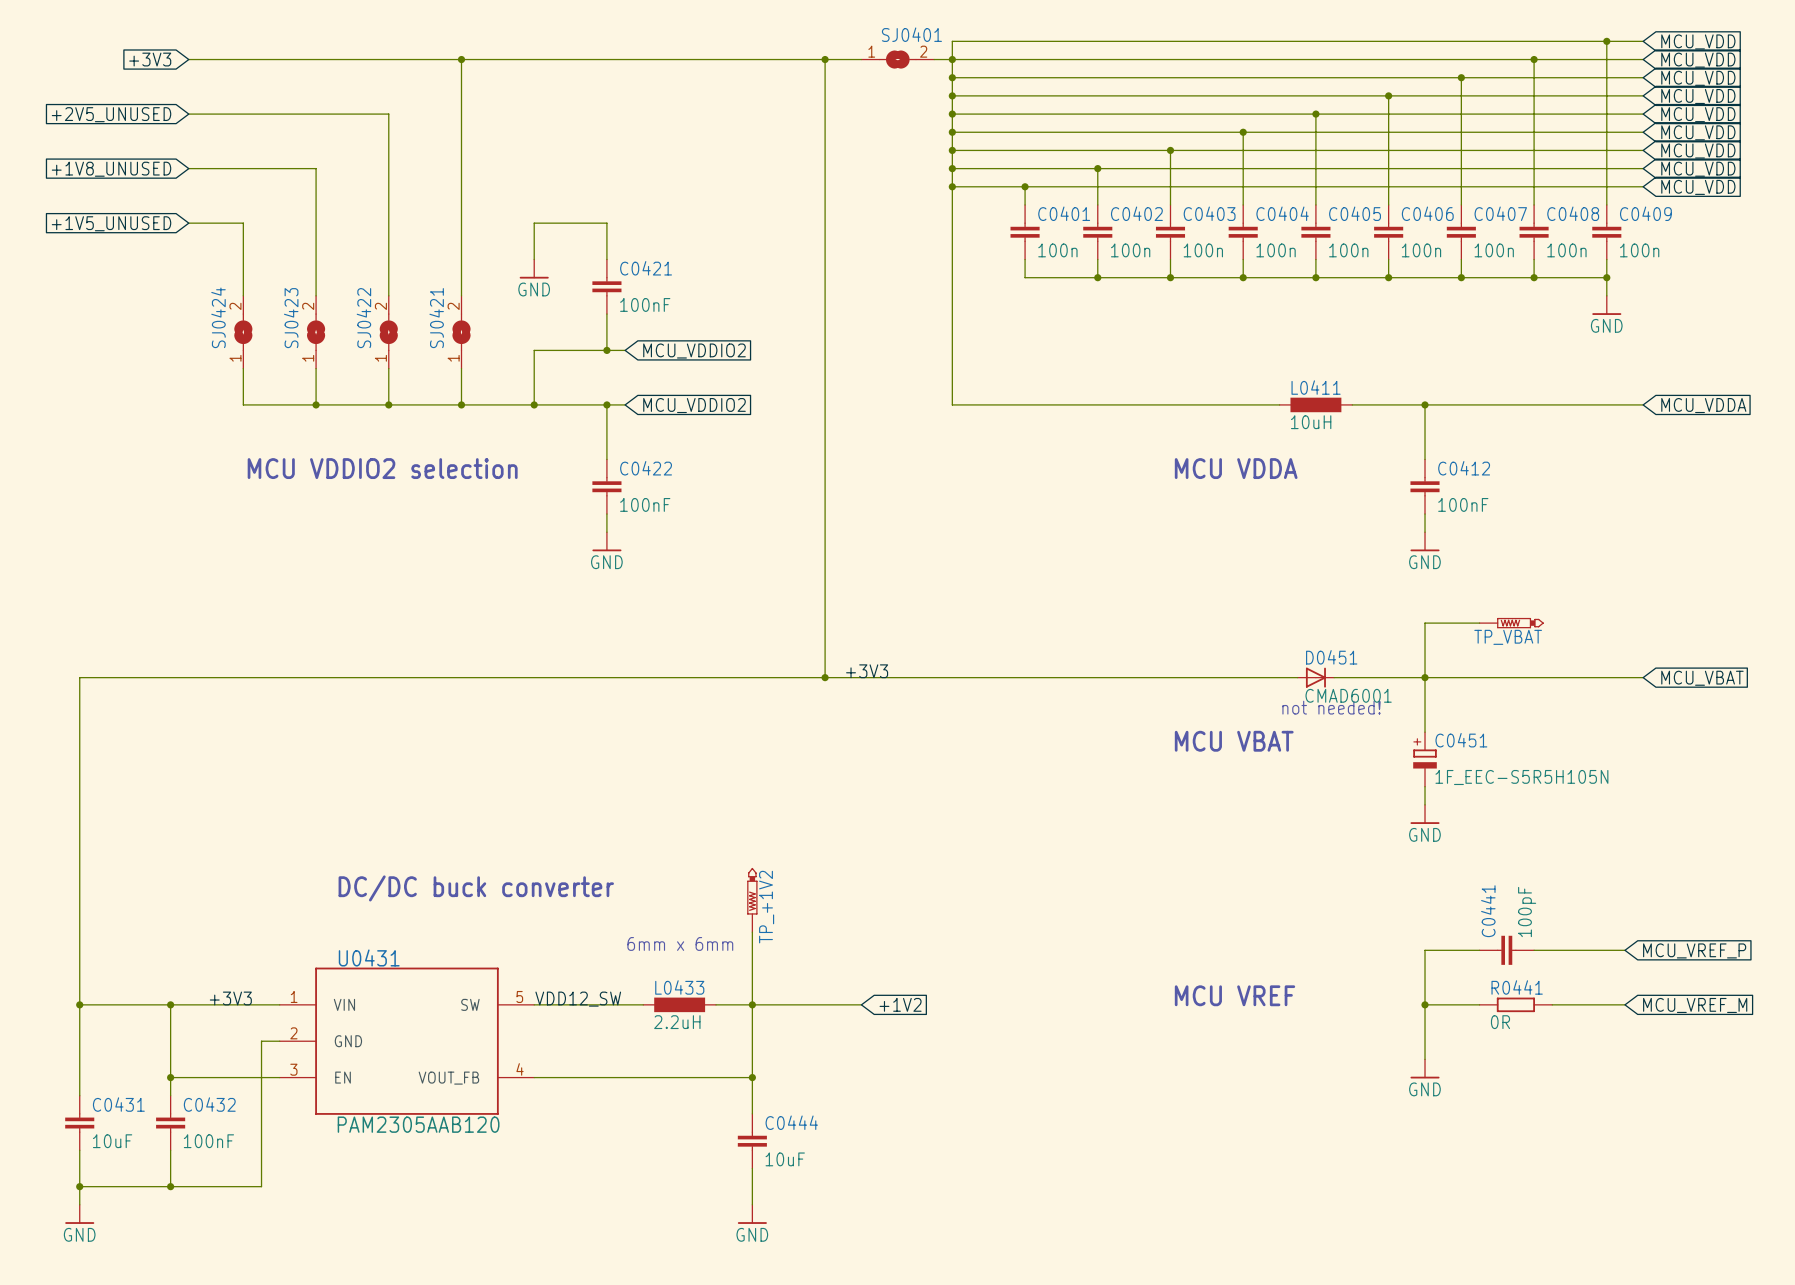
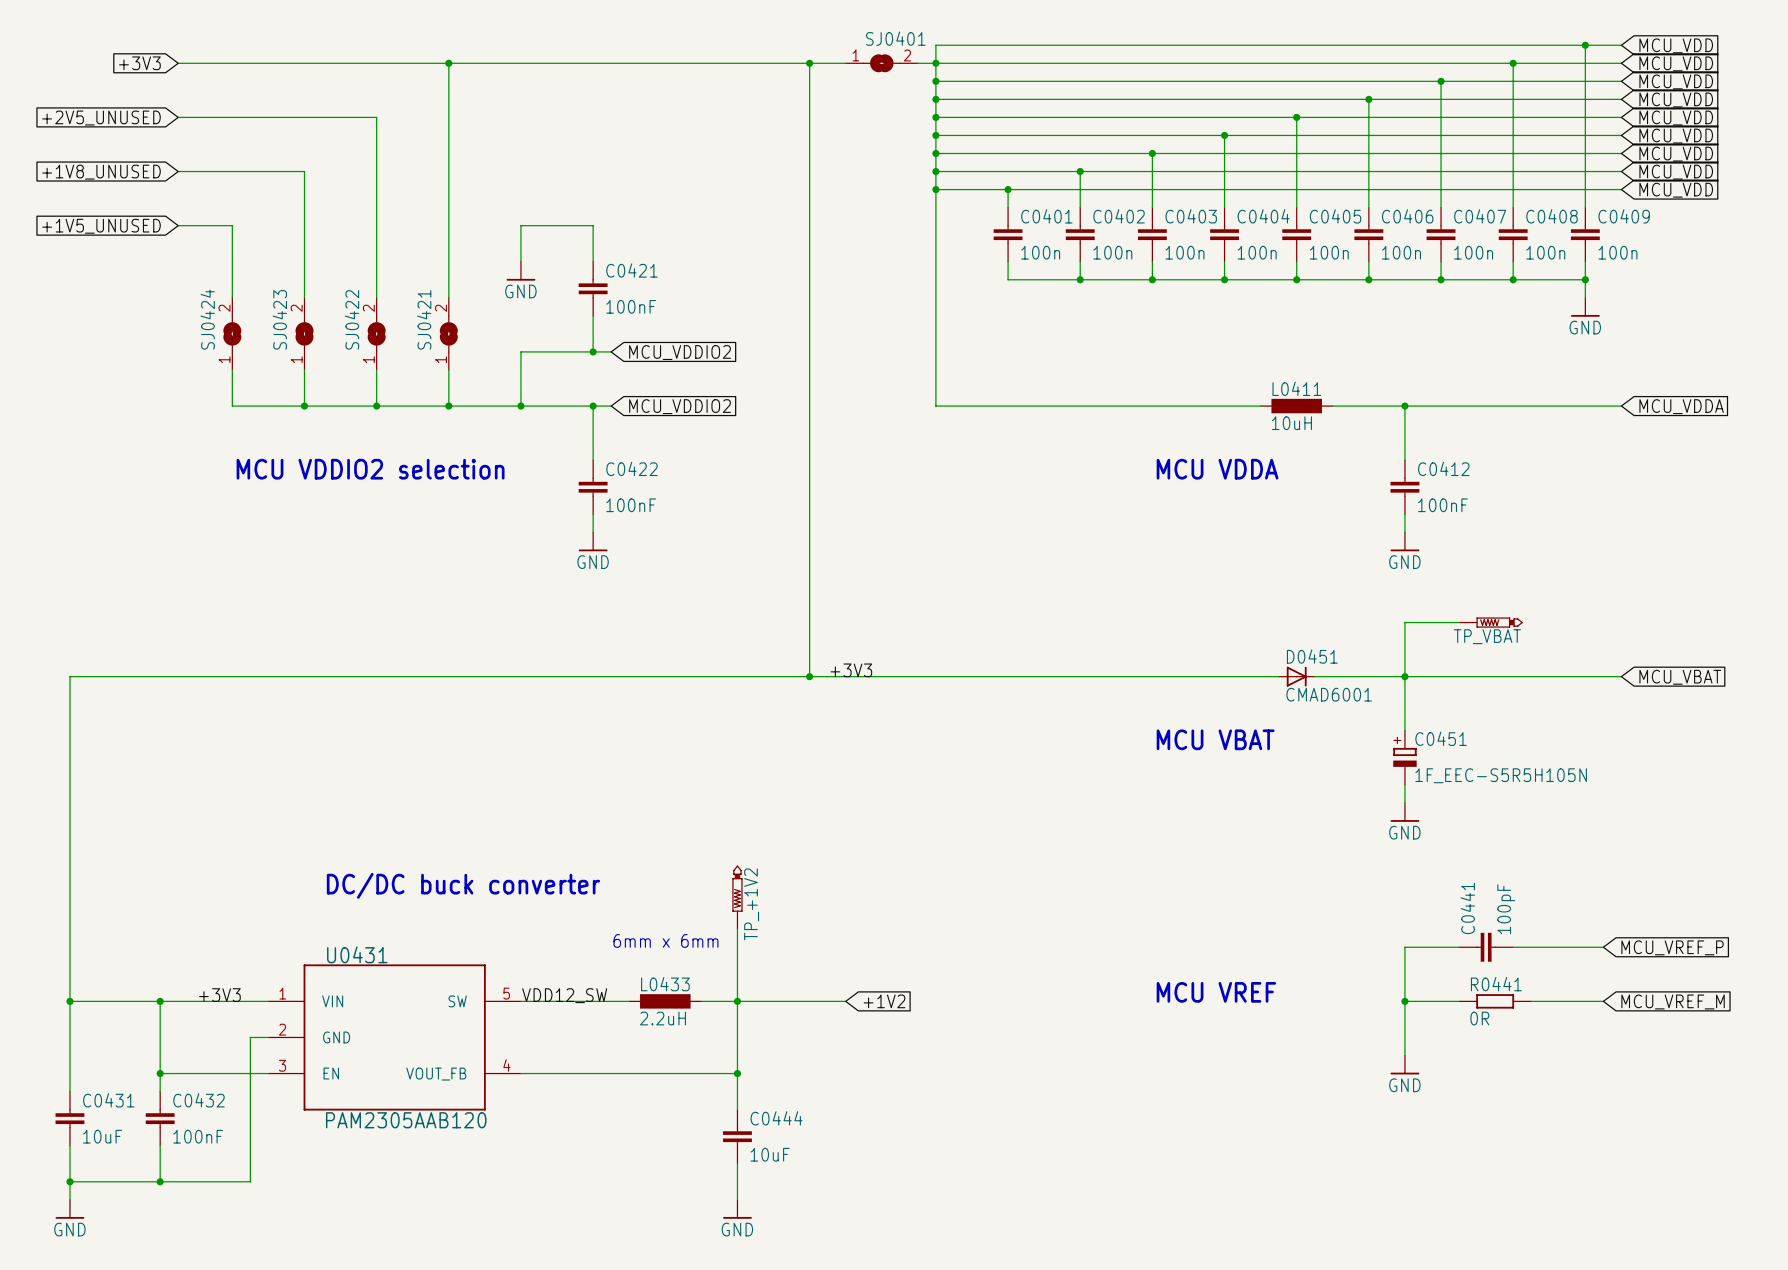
text: not needed! (1331, 707) -> none

